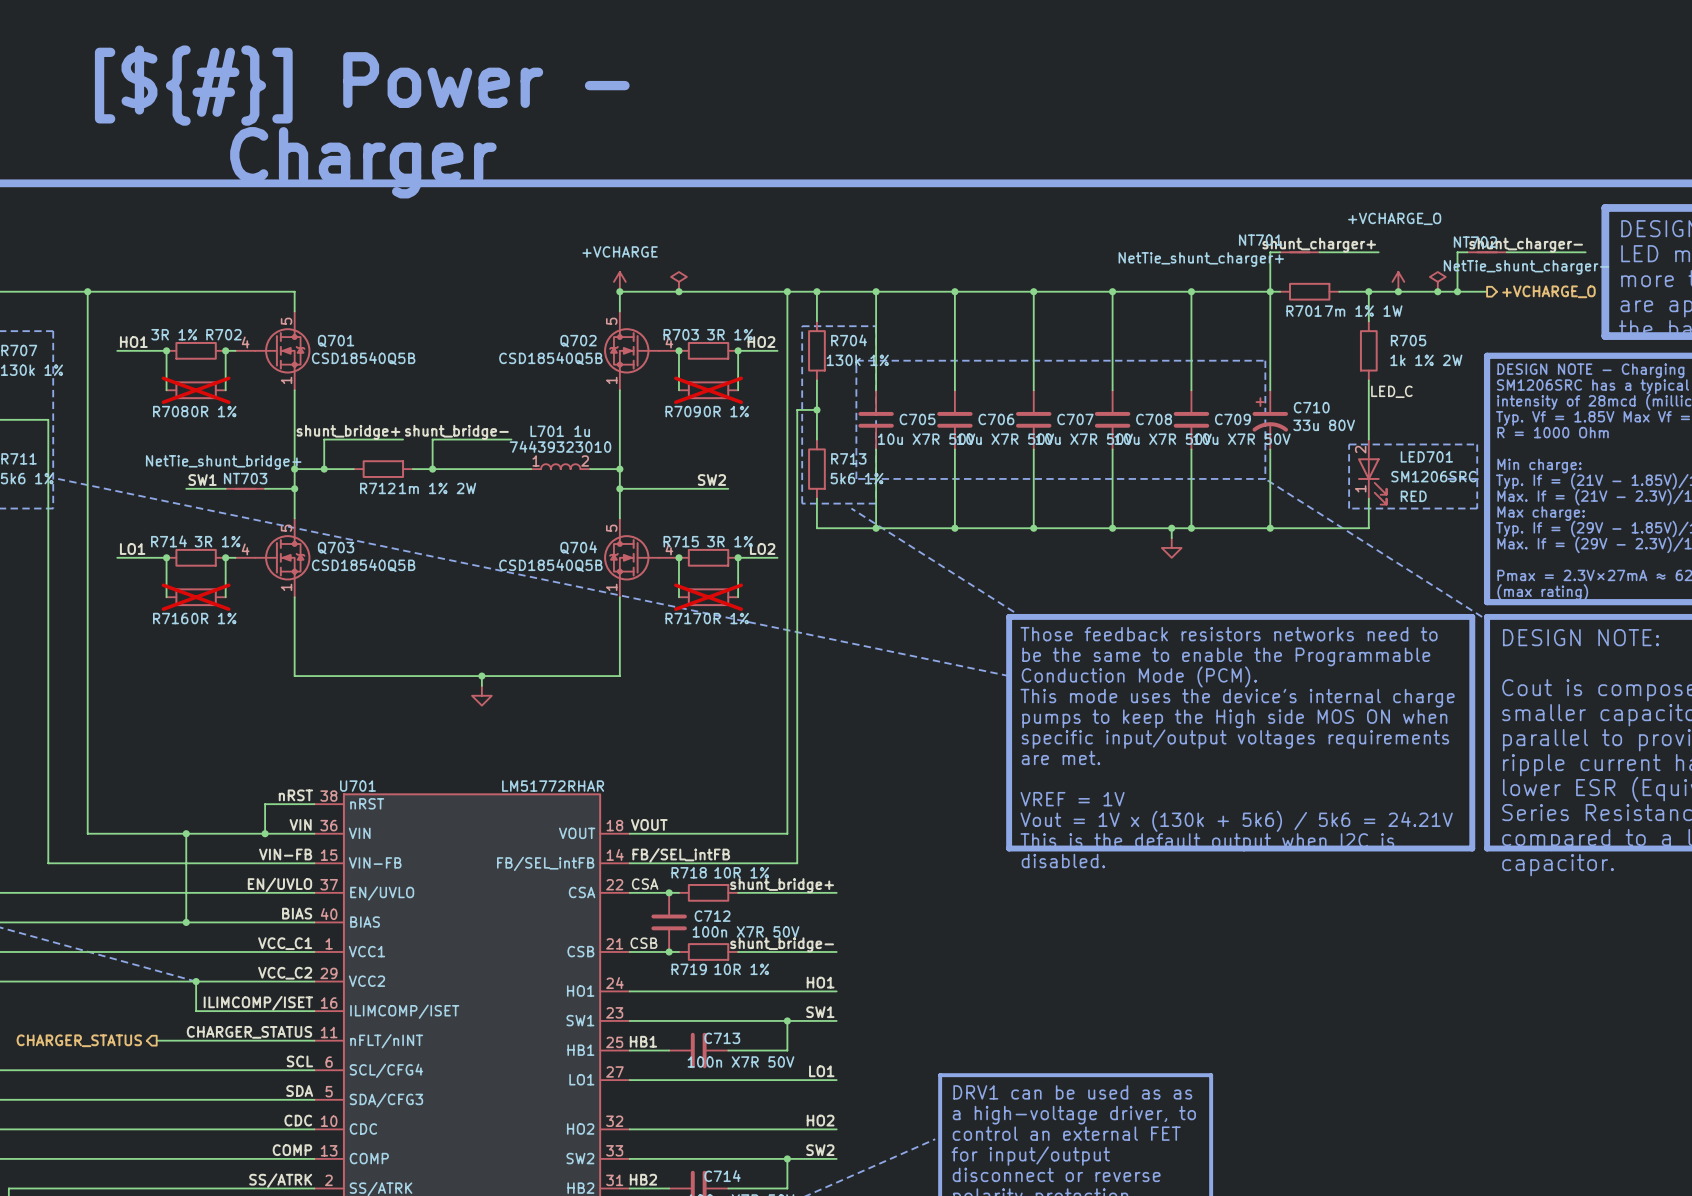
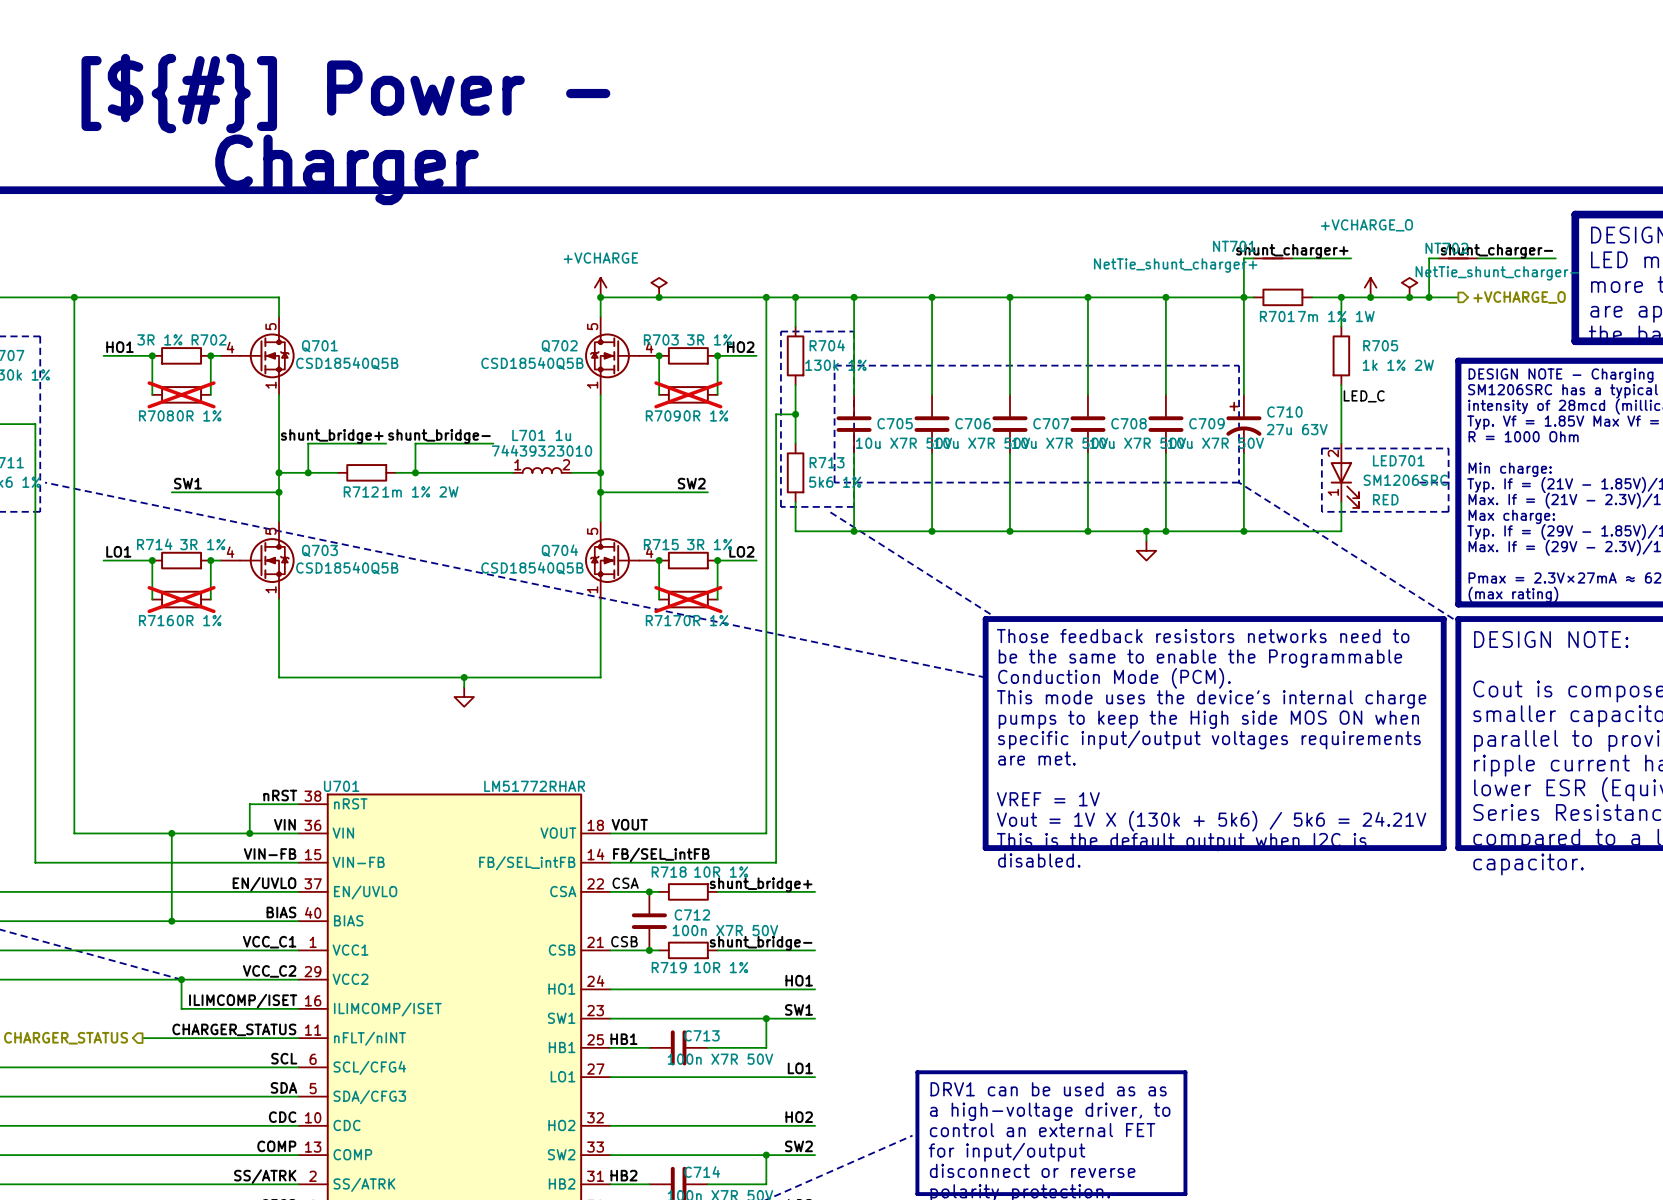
C710 value: 33u 80V (1324, 425) -> 27u 63V (1297, 429)
NT703: NetTie_shunt_bridge+ (245, 488) -> none
text: Vout = 1V x (130k + 5k6) / 5k6 = 24.21V (1236, 821) -> Vout = 1V X (130k + 5k6) / 5k6 = 24.21V (1211, 821)

